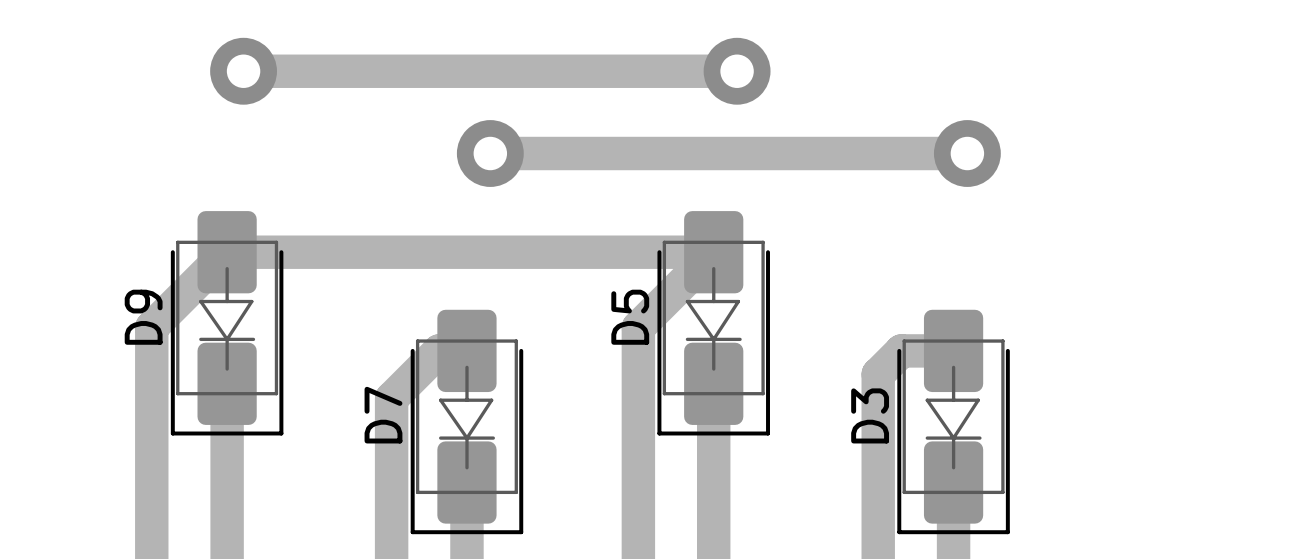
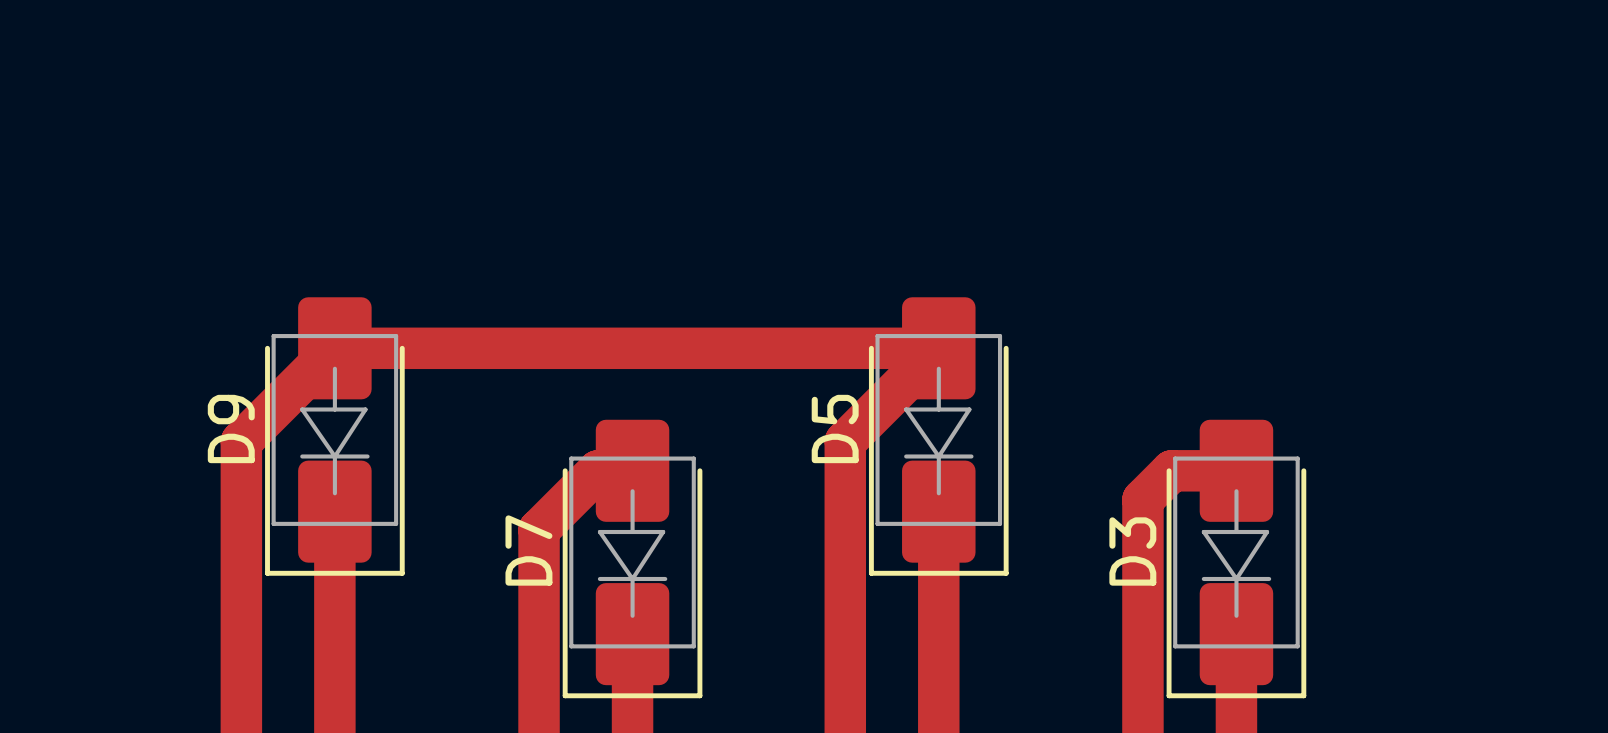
track: (243, 71) (737, 71) -> none
via: (243, 71) -> none
via: (737, 71) -> none
track: (490, 153) (967, 153) -> none
via: (490, 153) -> none
via: (967, 153) -> none

